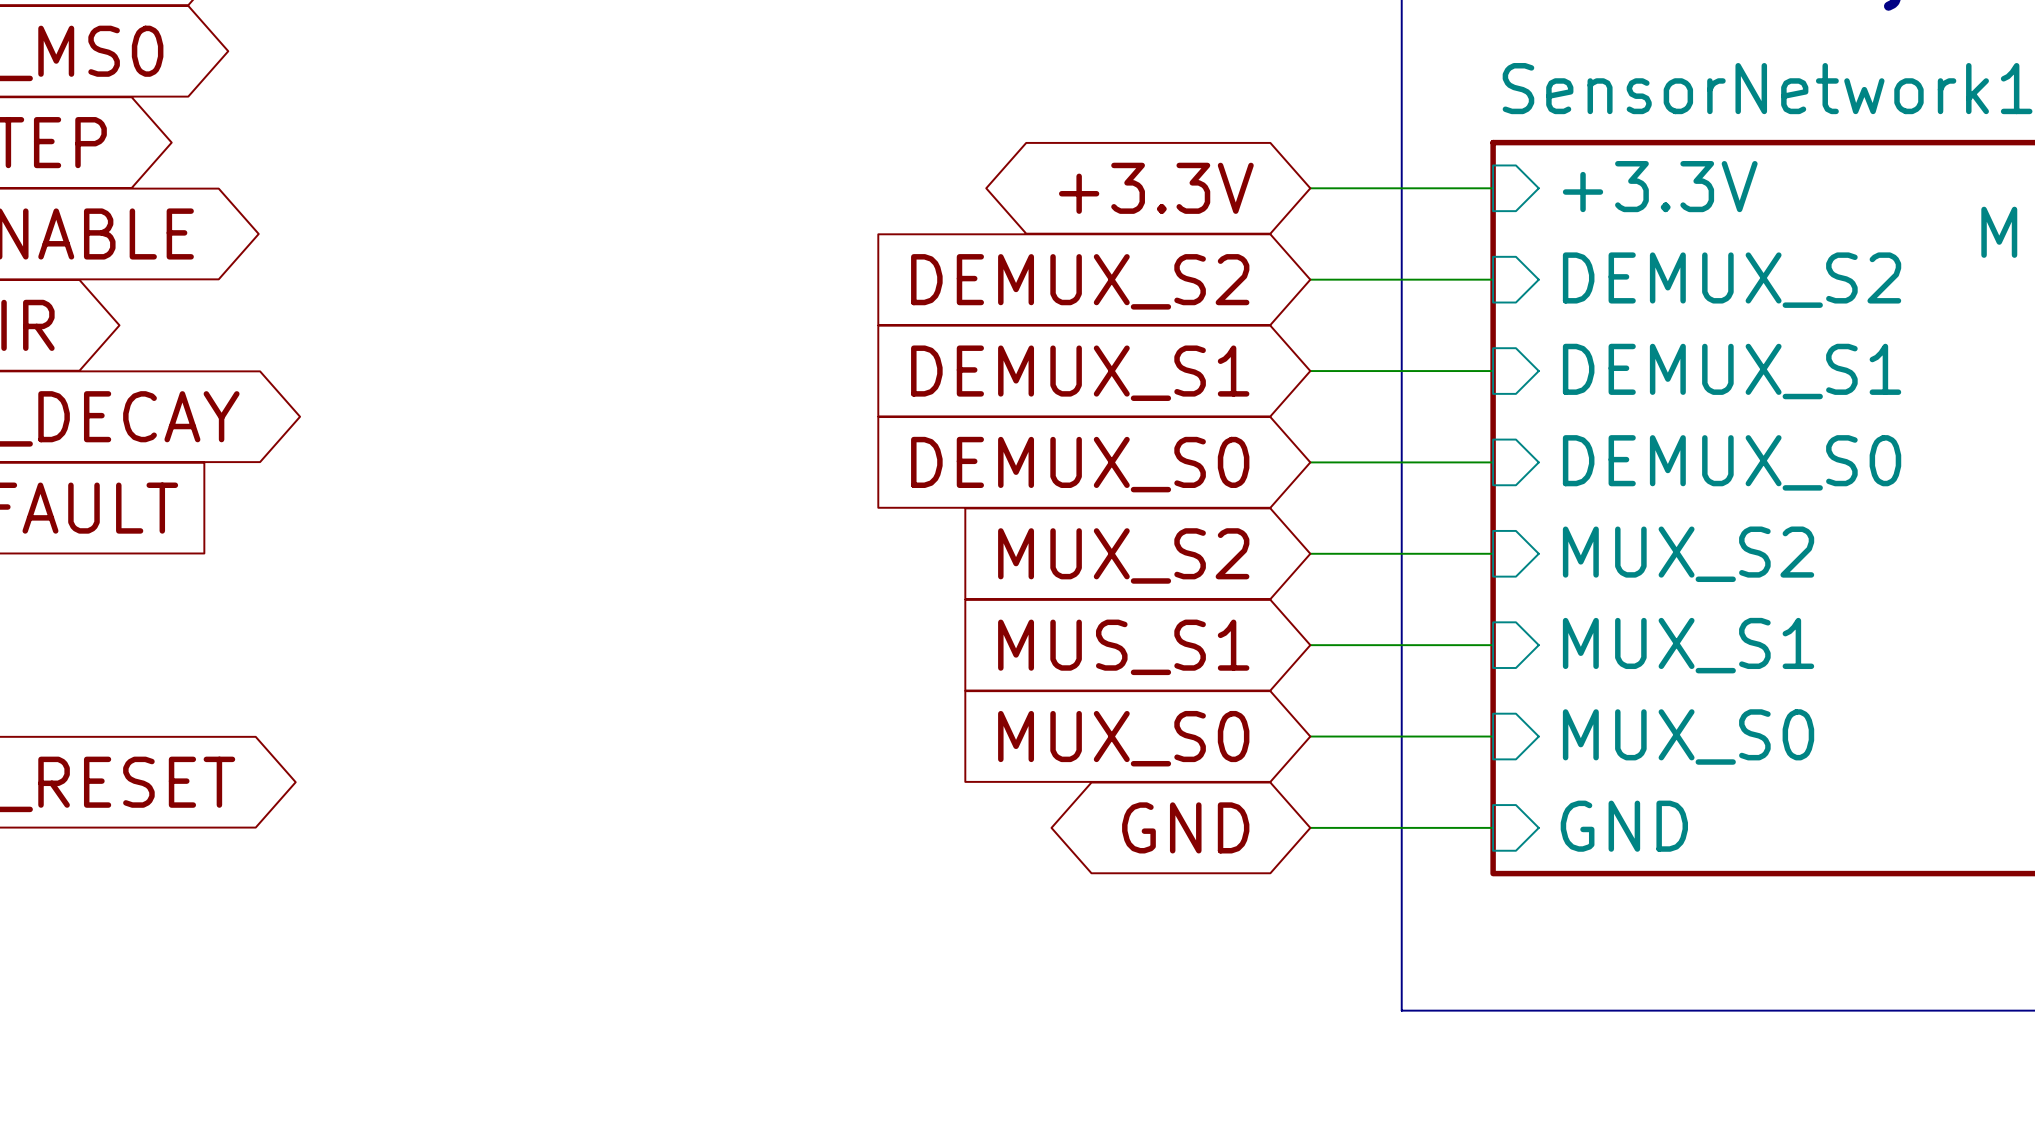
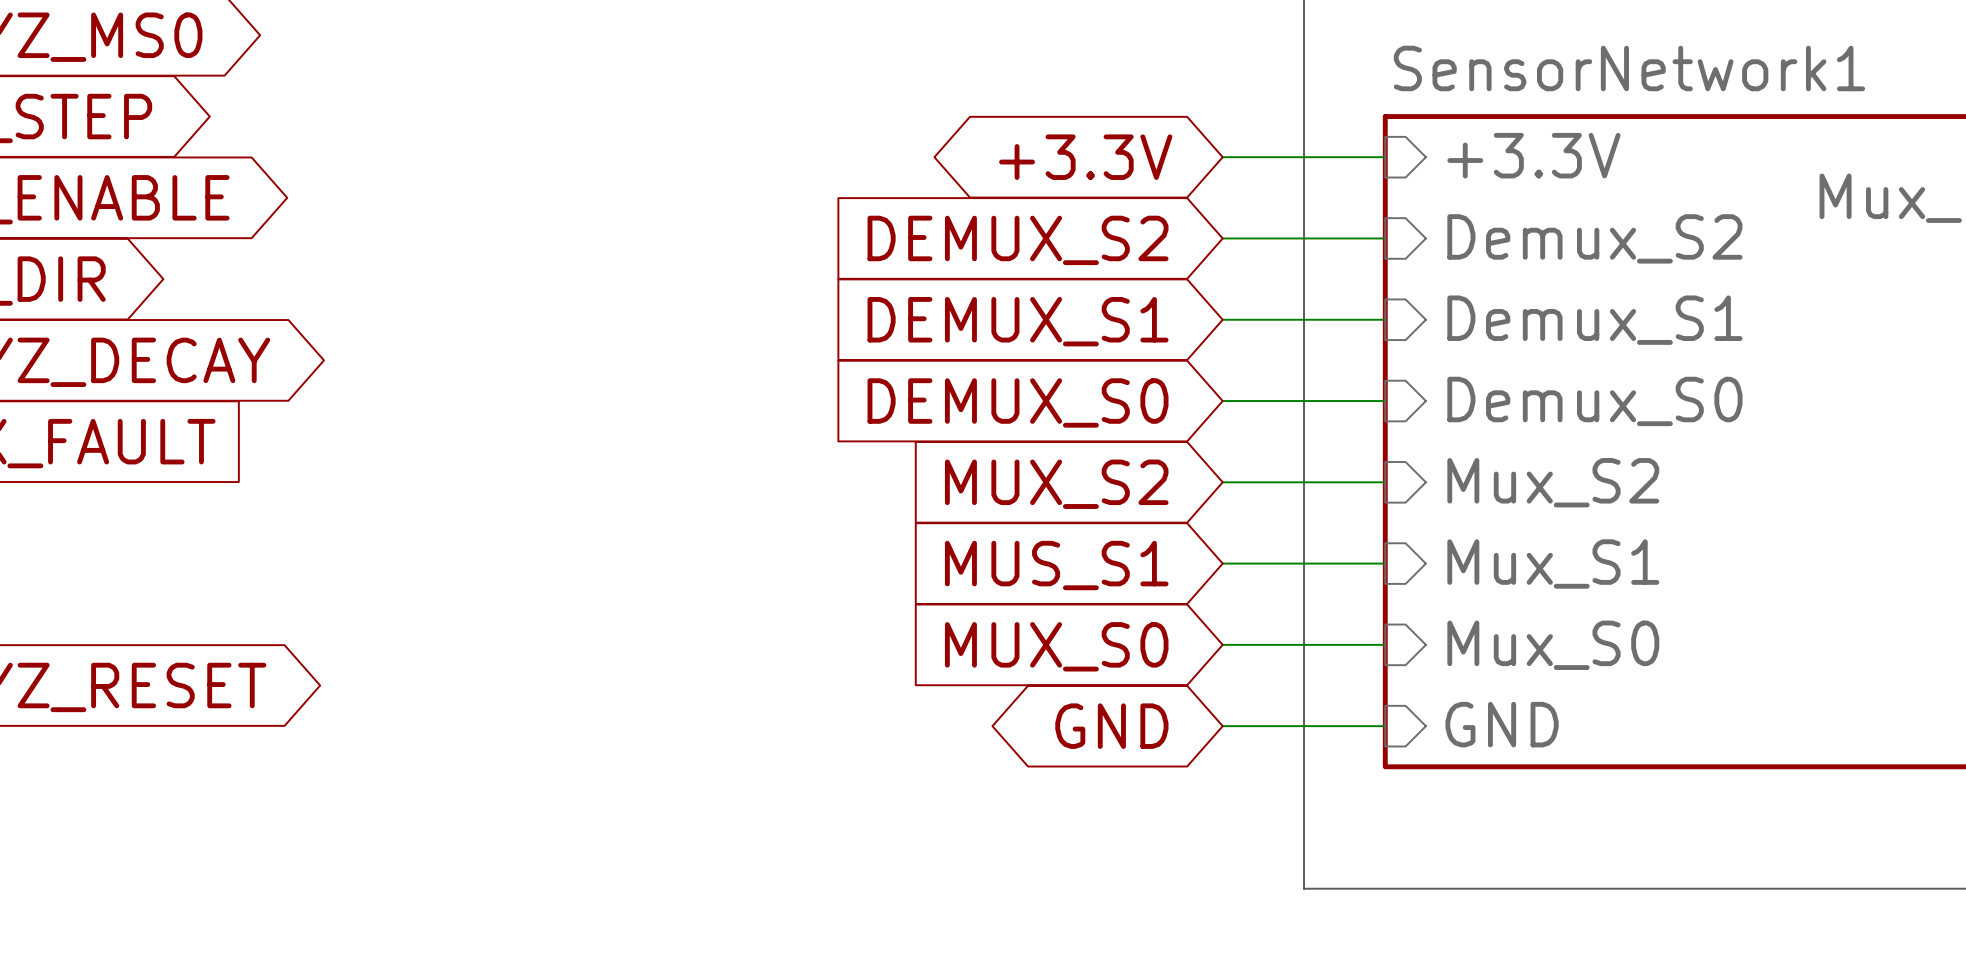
sheet pin: DEMUX_S2 (1732, 280) -> Demux_S2 (1594, 238)
sheet pin: DEMUX_S1 (1732, 371) -> Demux_S1 (1594, 320)
sheet pin: DEMUX_S0 (1732, 462) -> Demux_S0 (1594, 401)
sheet pin: MUX_S2 (1688, 554) -> Mux_S2 (1553, 482)
sheet pin: MUX_S1 (1688, 645) -> Mux_S1 (1553, 564)
sheet pin: MUX_S0 (1688, 736) -> Mux_S0 (1553, 645)

